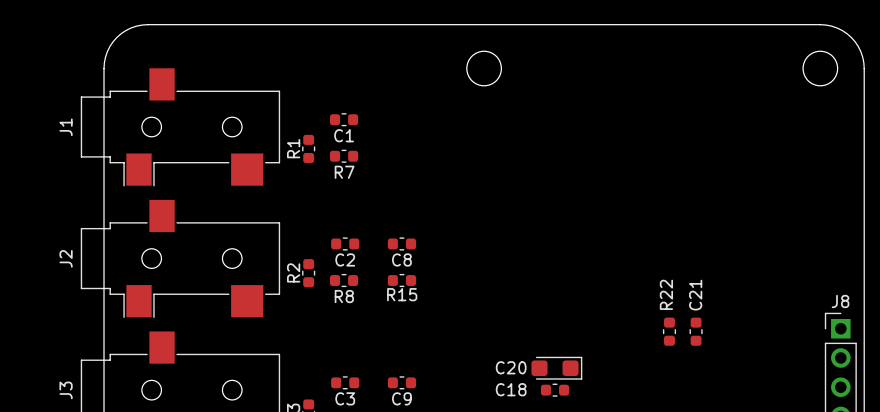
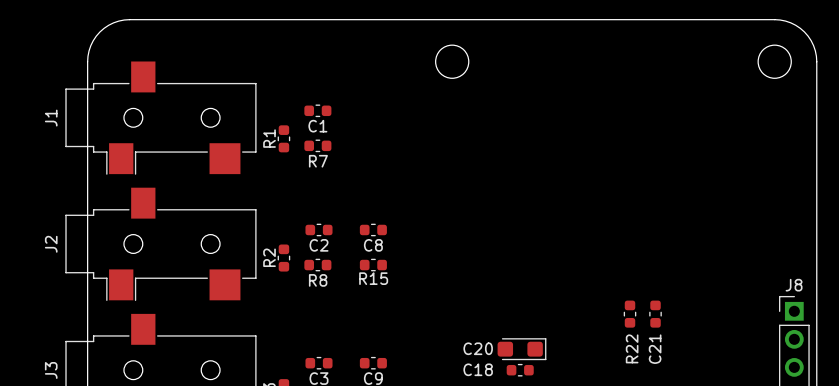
R22 name position: R22 (666, 294) -> R22 (632, 348)
C21 name position: C21 (695, 295) -> C21 (655, 349)

